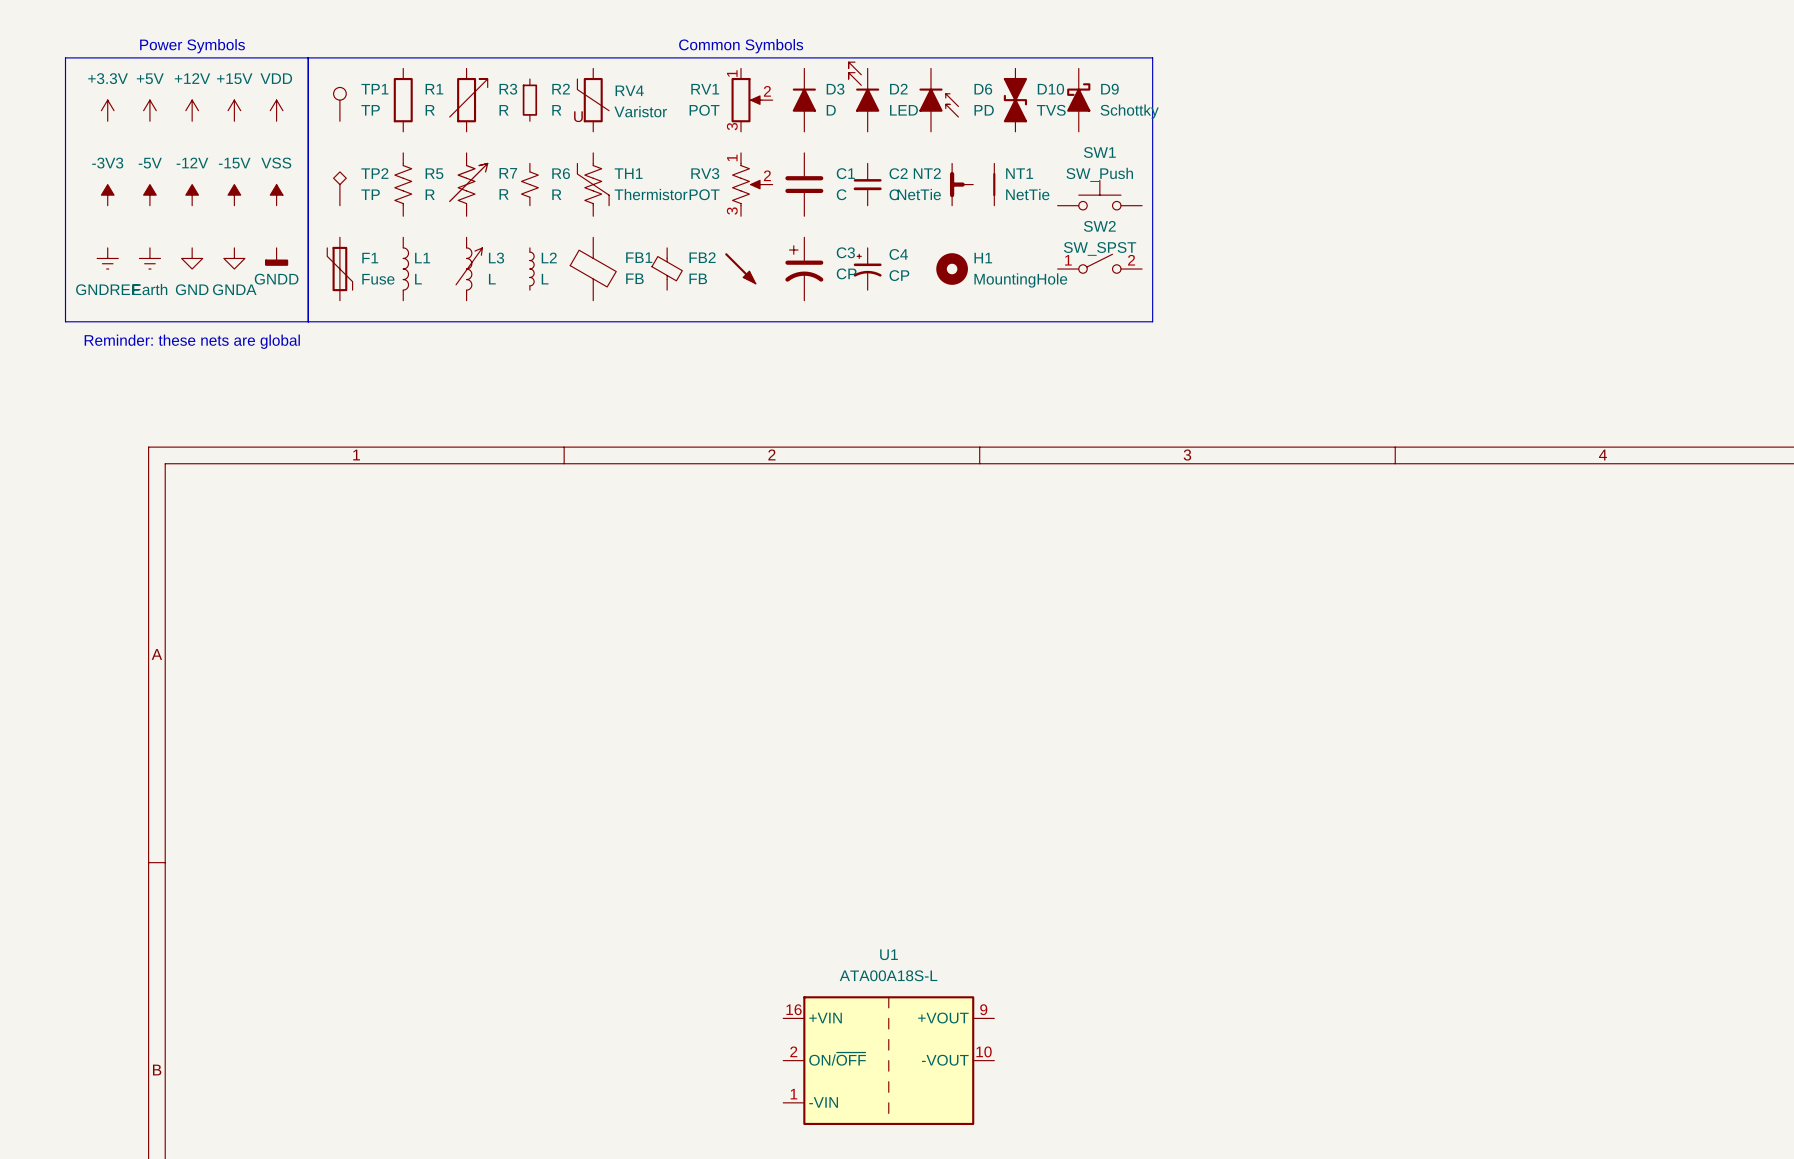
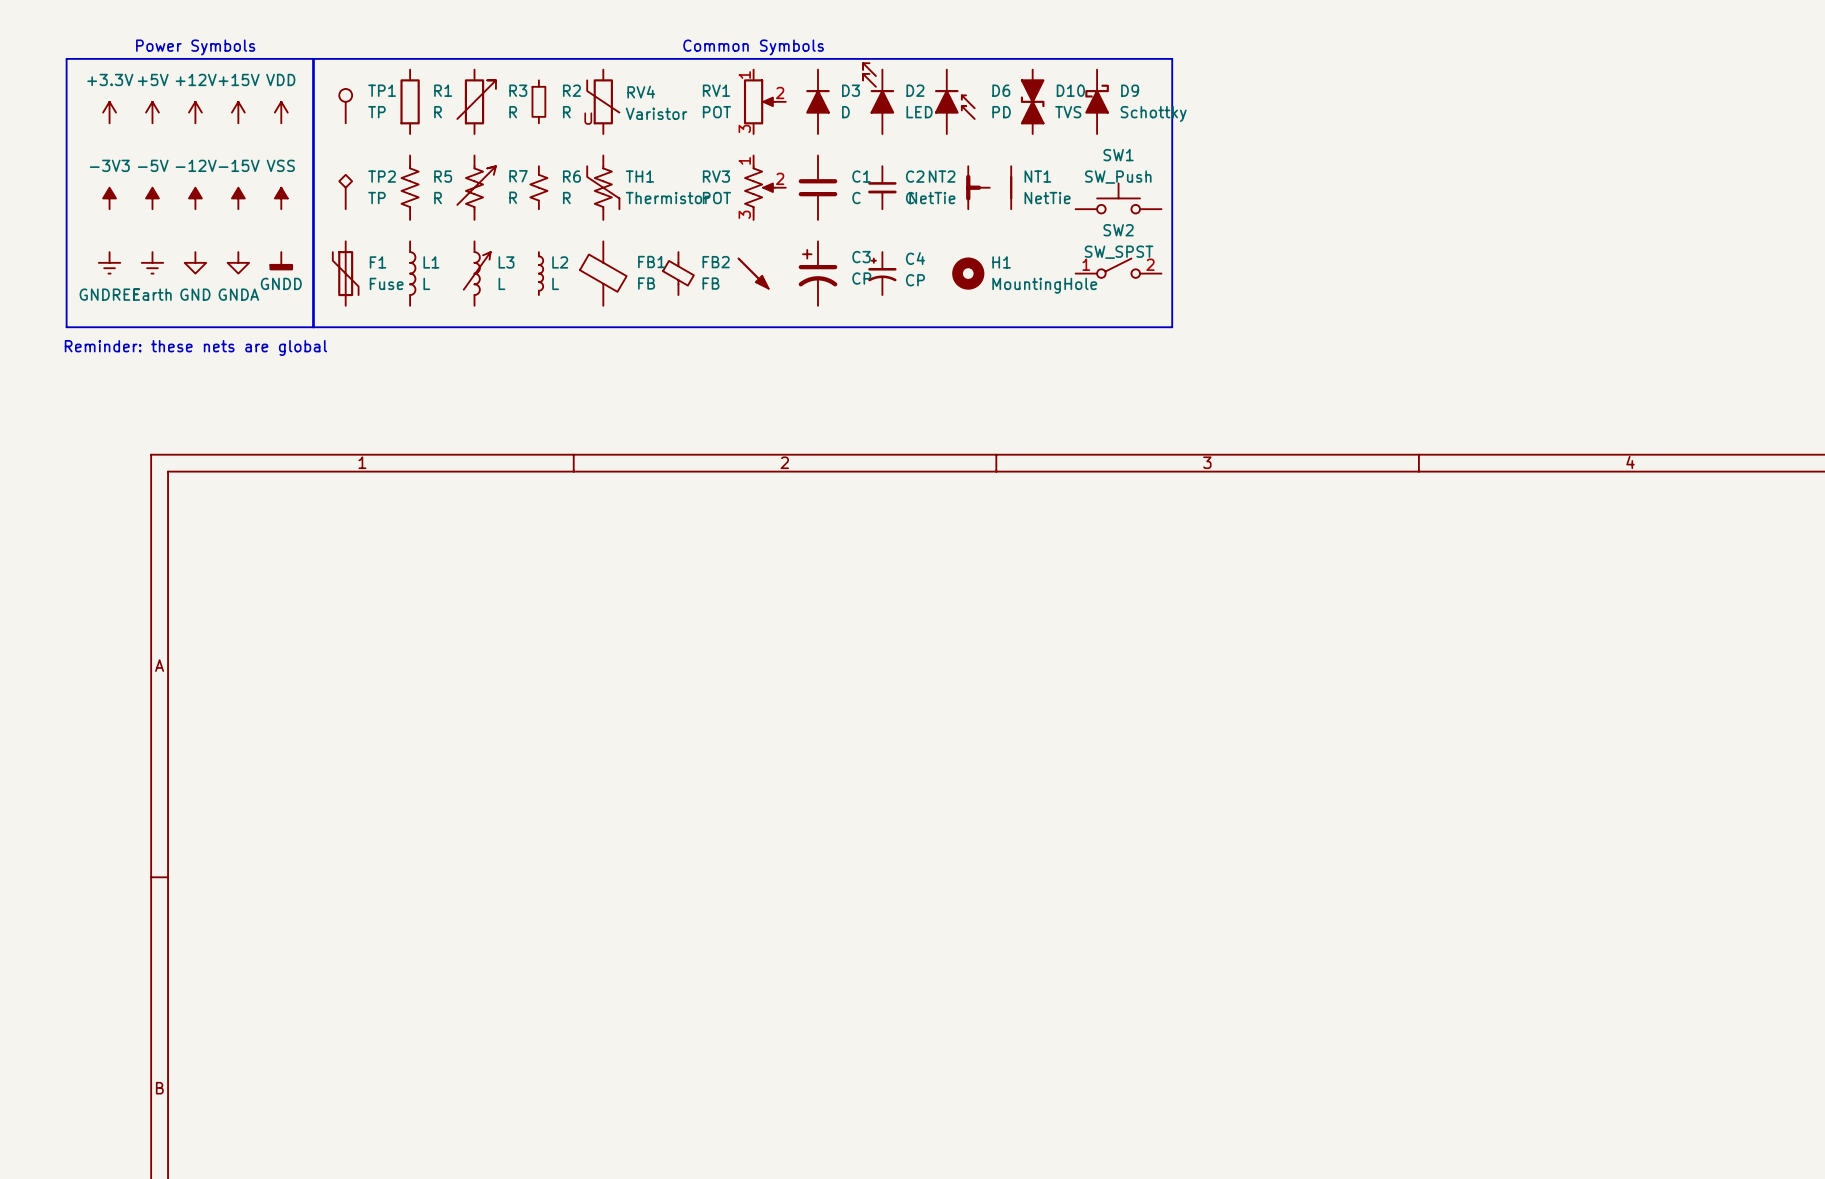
U1: ATA00A18S-L (888, 1060) -> none

